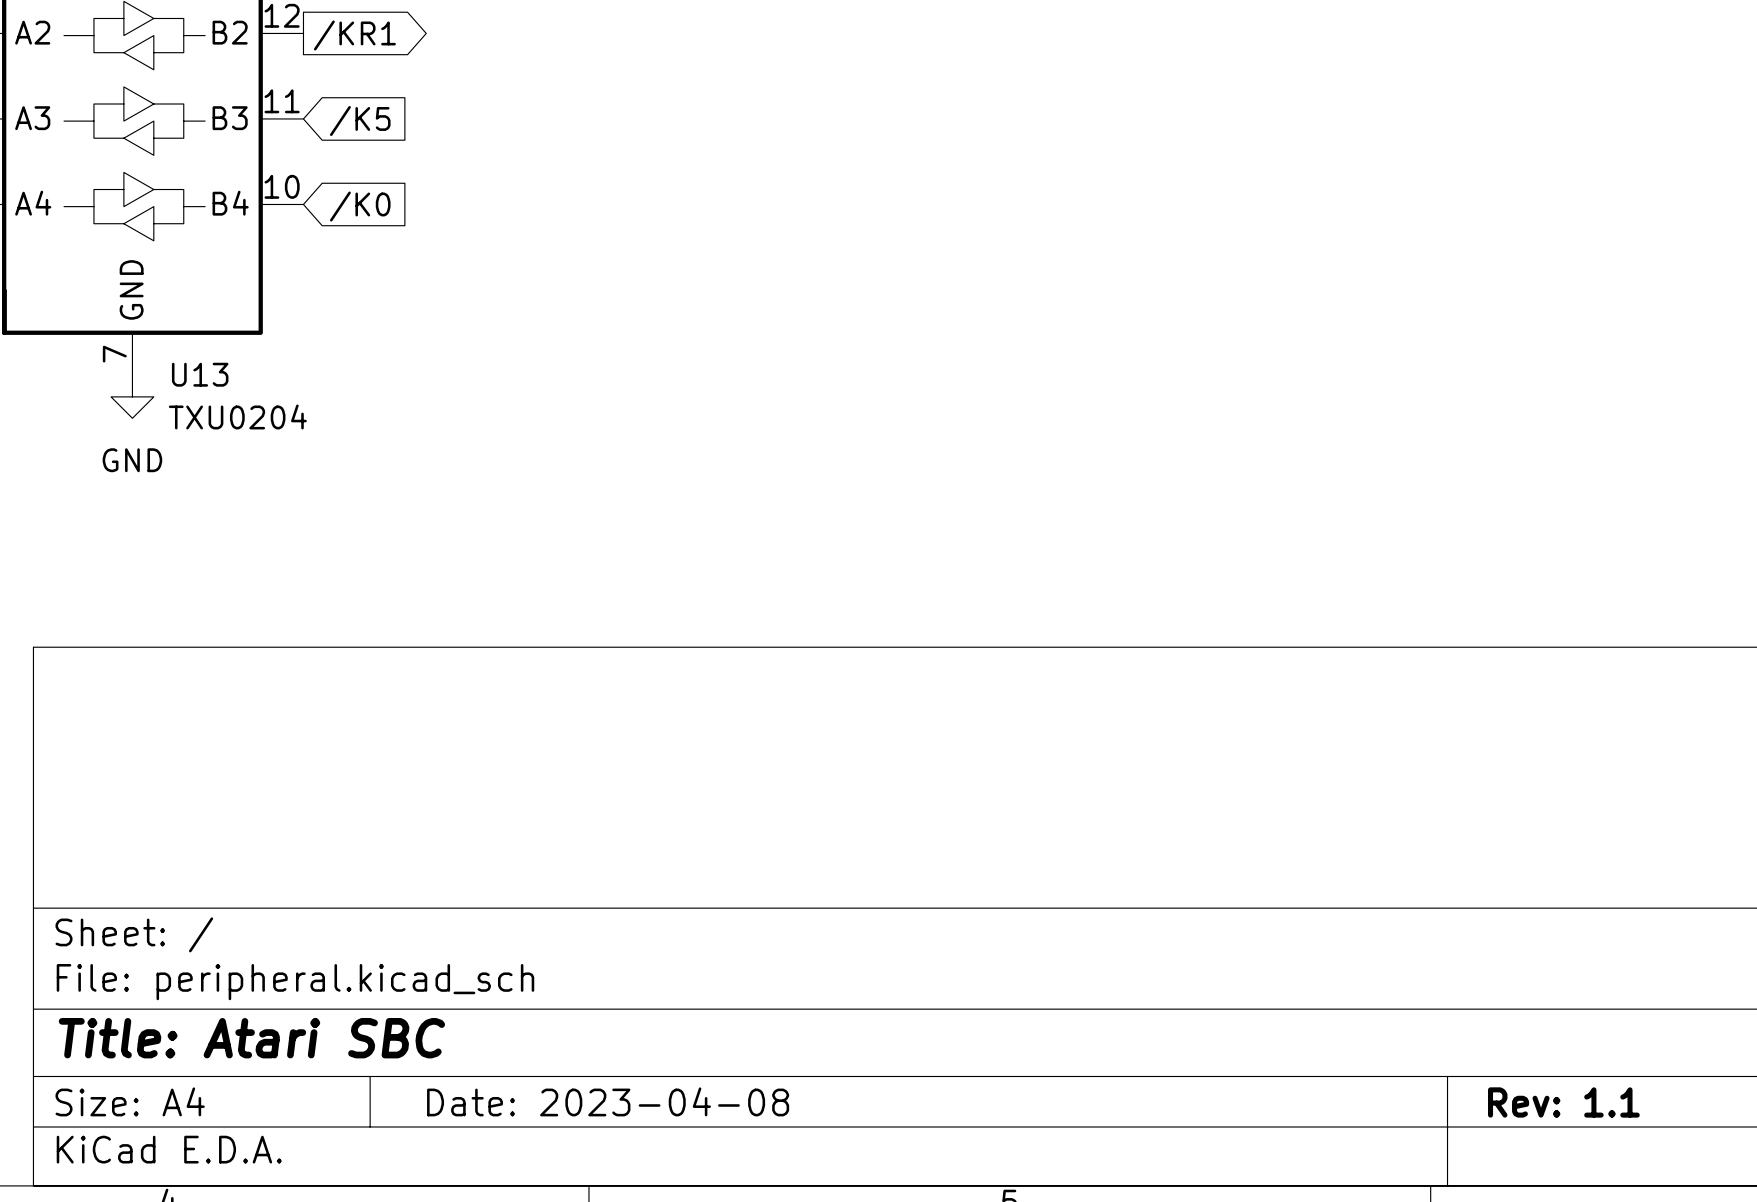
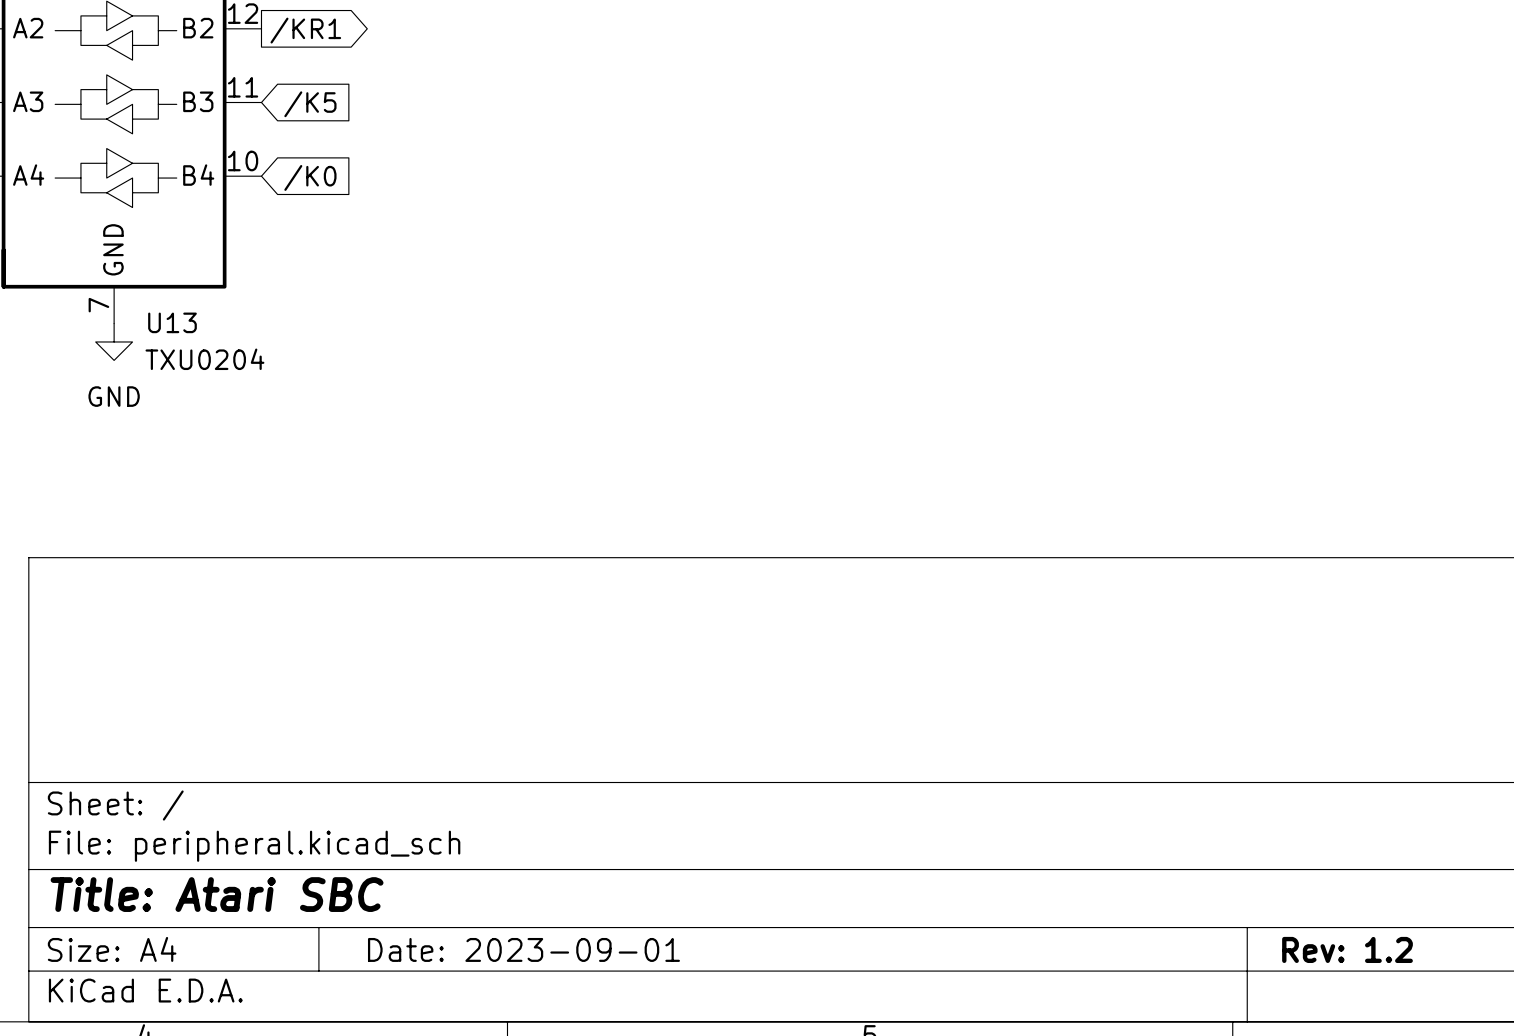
title block: Date: 2023-04-08 (608, 1101) -> Date: 2023-09-01 (523, 949)
title block: Rev: 1.1 (1563, 1102) -> Rev: 1.2 (1347, 949)

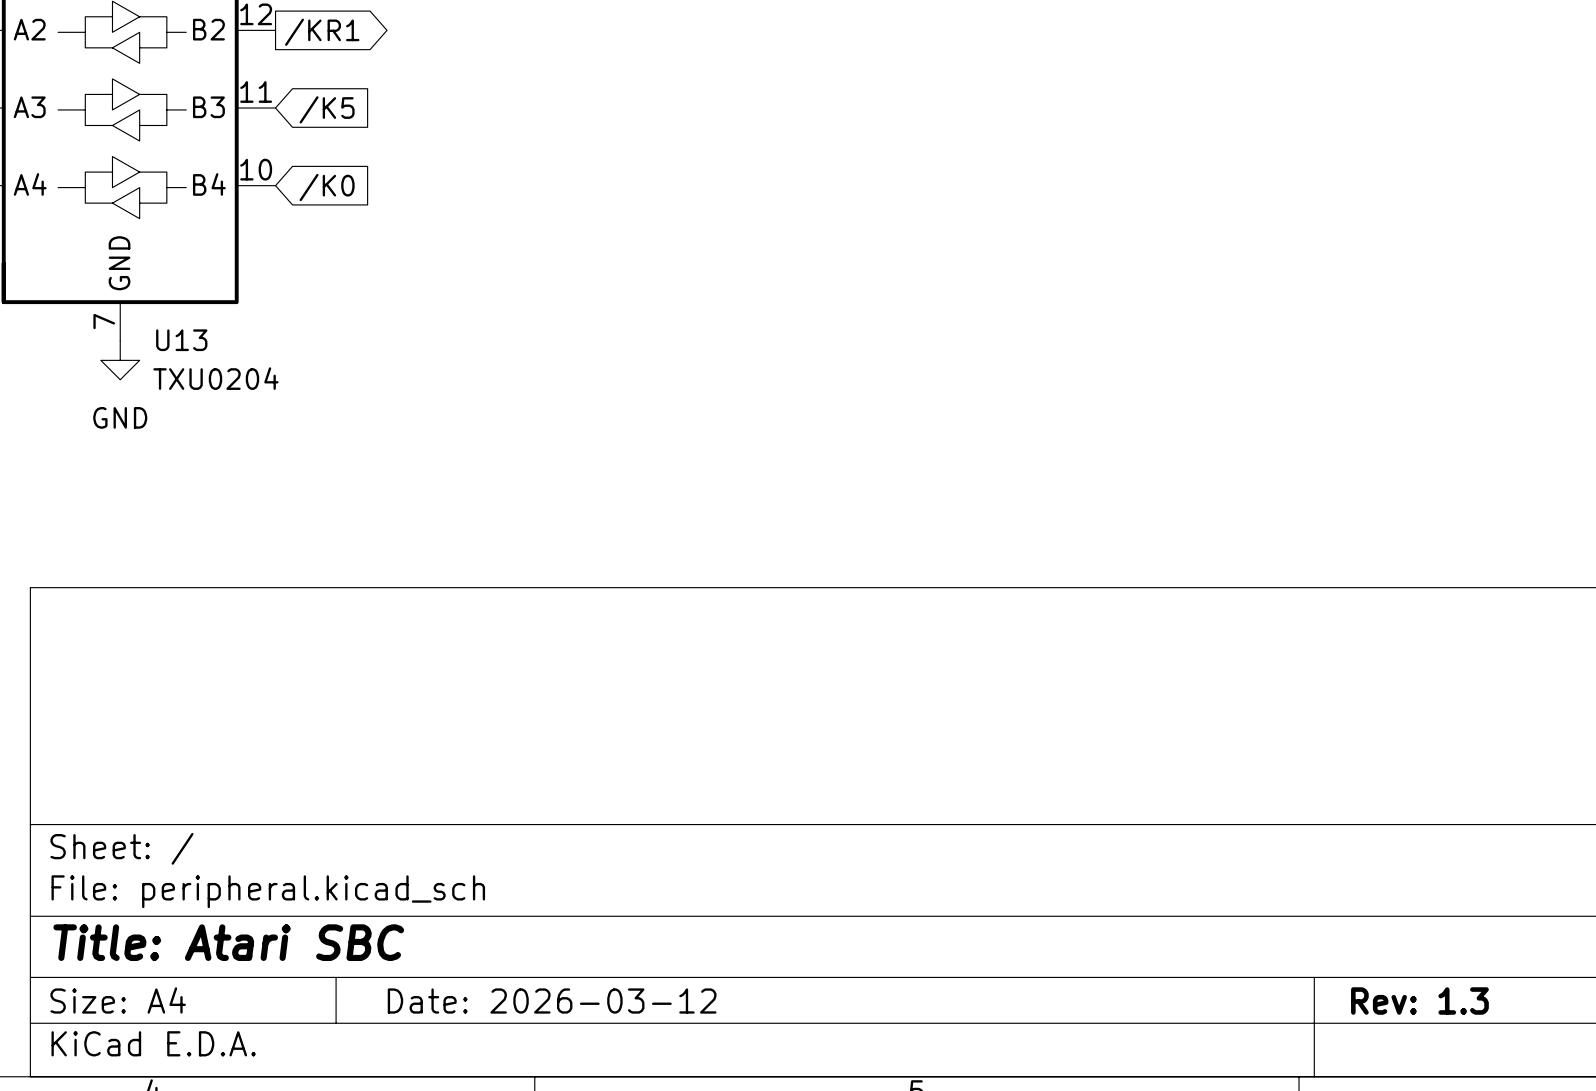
title block: Date: 2023-09-01 (523, 949) -> Date: 2026-03-12 (552, 1001)
title block: Rev: 1.2 (1347, 949) -> Rev: 1.3 (1419, 1001)

